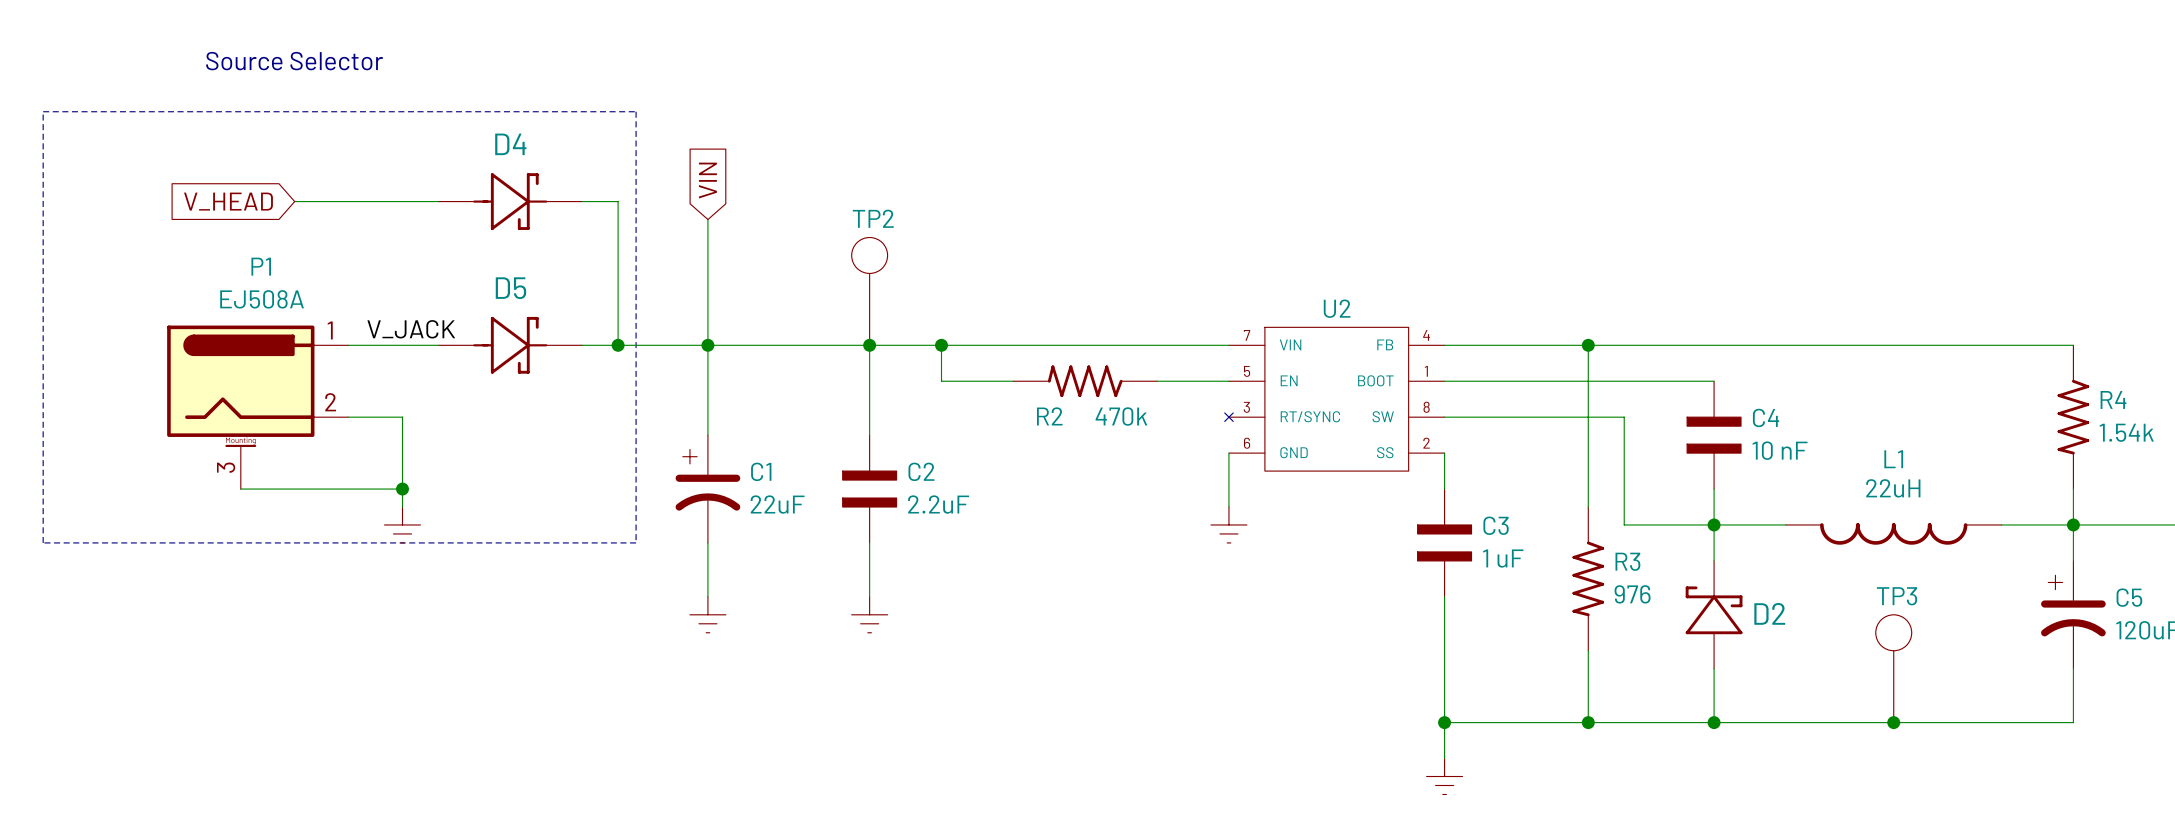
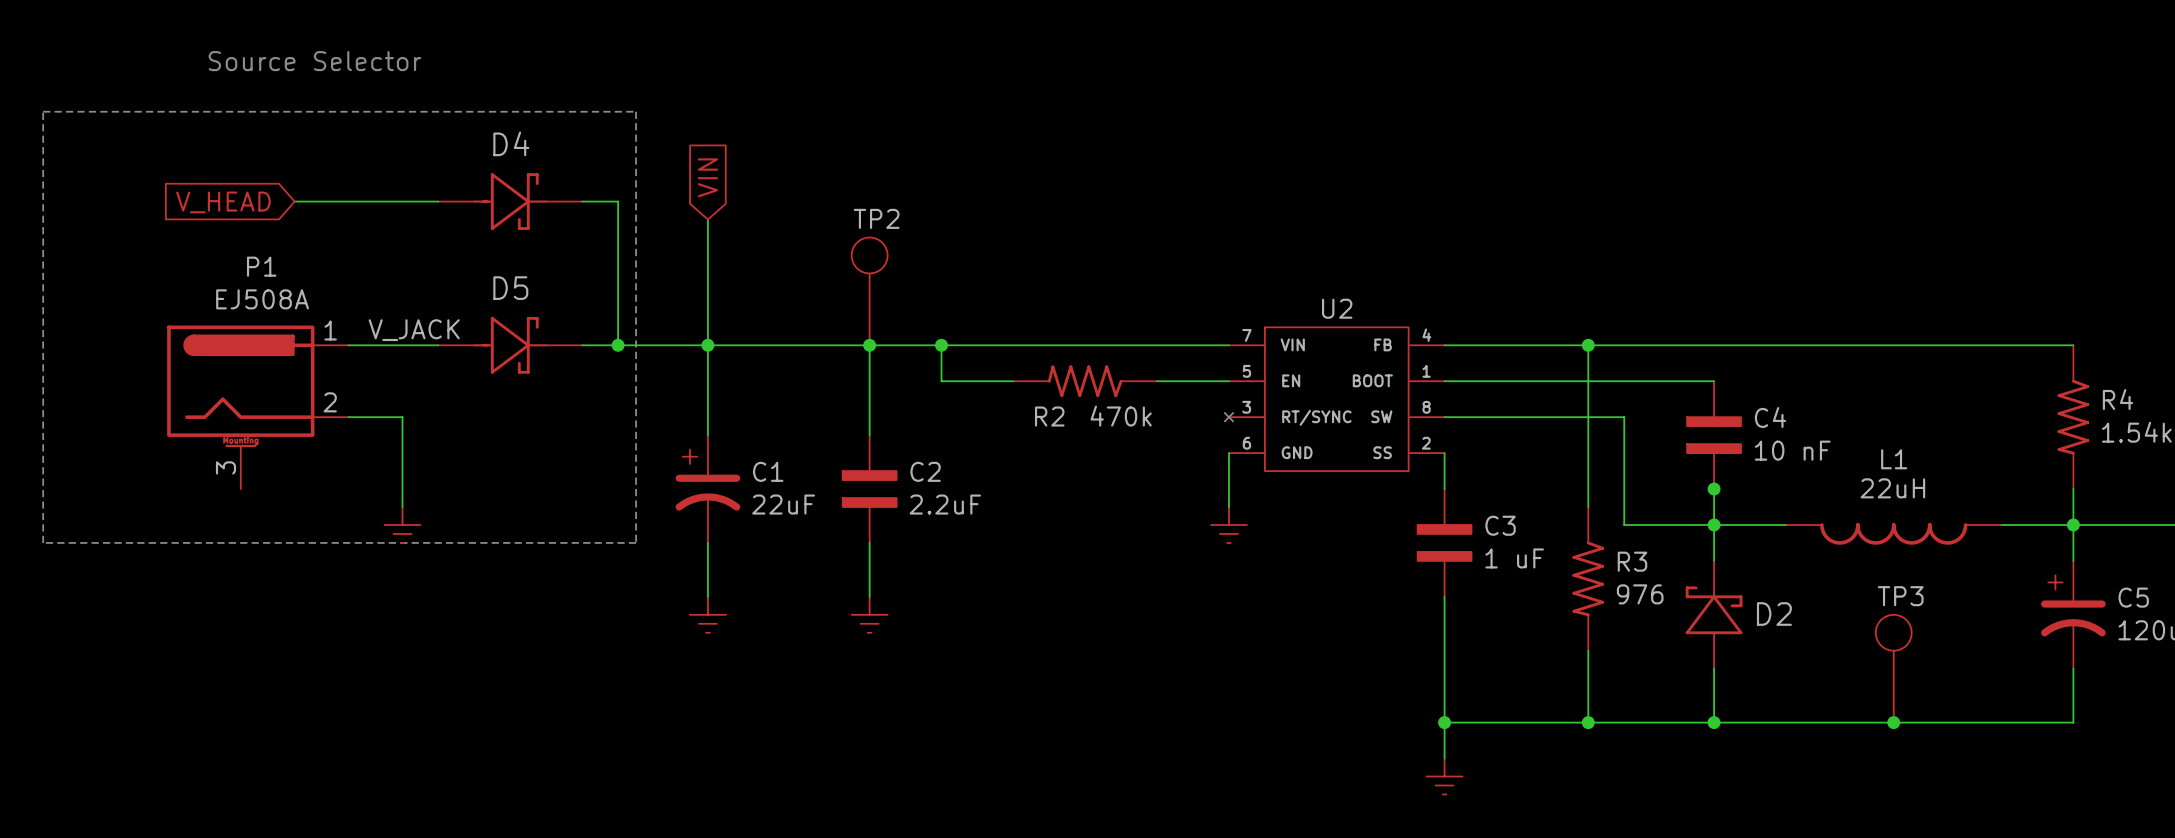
wire: (240, 489) (402, 489) -> none
junction: (402, 489) -> none
junction: none -> (1714, 489)

